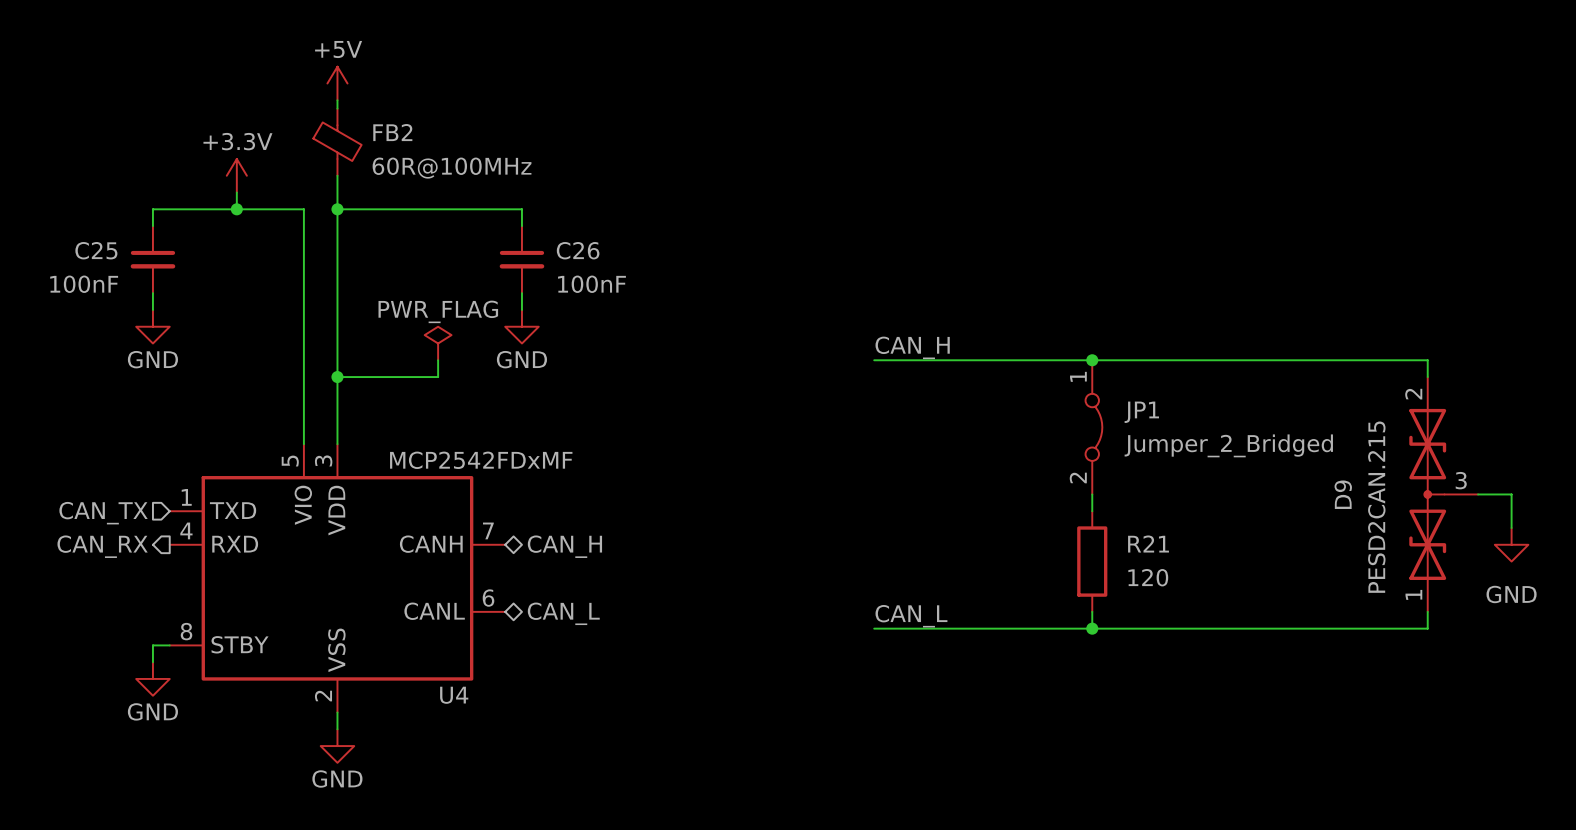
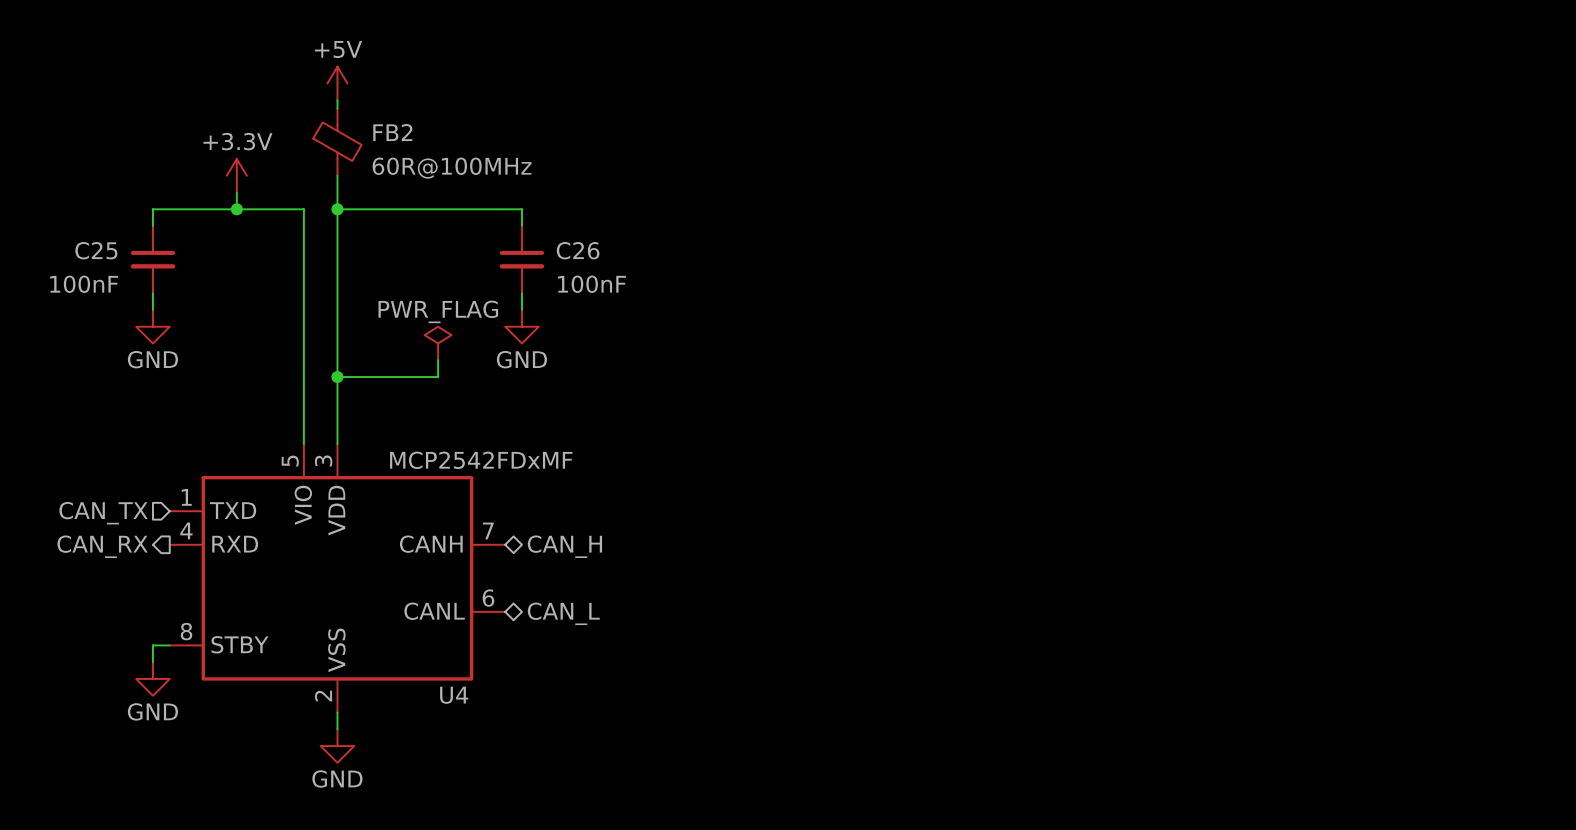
label: CAN_H (912, 347) -> none
wire: (874, 360) (1427, 360) (1427, 377) -> none
junction: (1092, 360) -> none
JP1: Jumper_2_Bridged (1093, 427) -> none
wire: (1092, 494) (1092, 511) -> none
D9: PESD2CAN.215 (1443, 494) -> none
wire: (1478, 494) (1511, 494) (1511, 528) -> none
power symbol: GND (1511, 544) -> none
R21: 120 (1092, 561) -> none
wire: (1092, 611) (1092, 628) -> none
wire: (1427, 611) (1427, 628) (874, 628) -> none
label: CAN_L (911, 616) -> none
junction: (1092, 628) -> none

